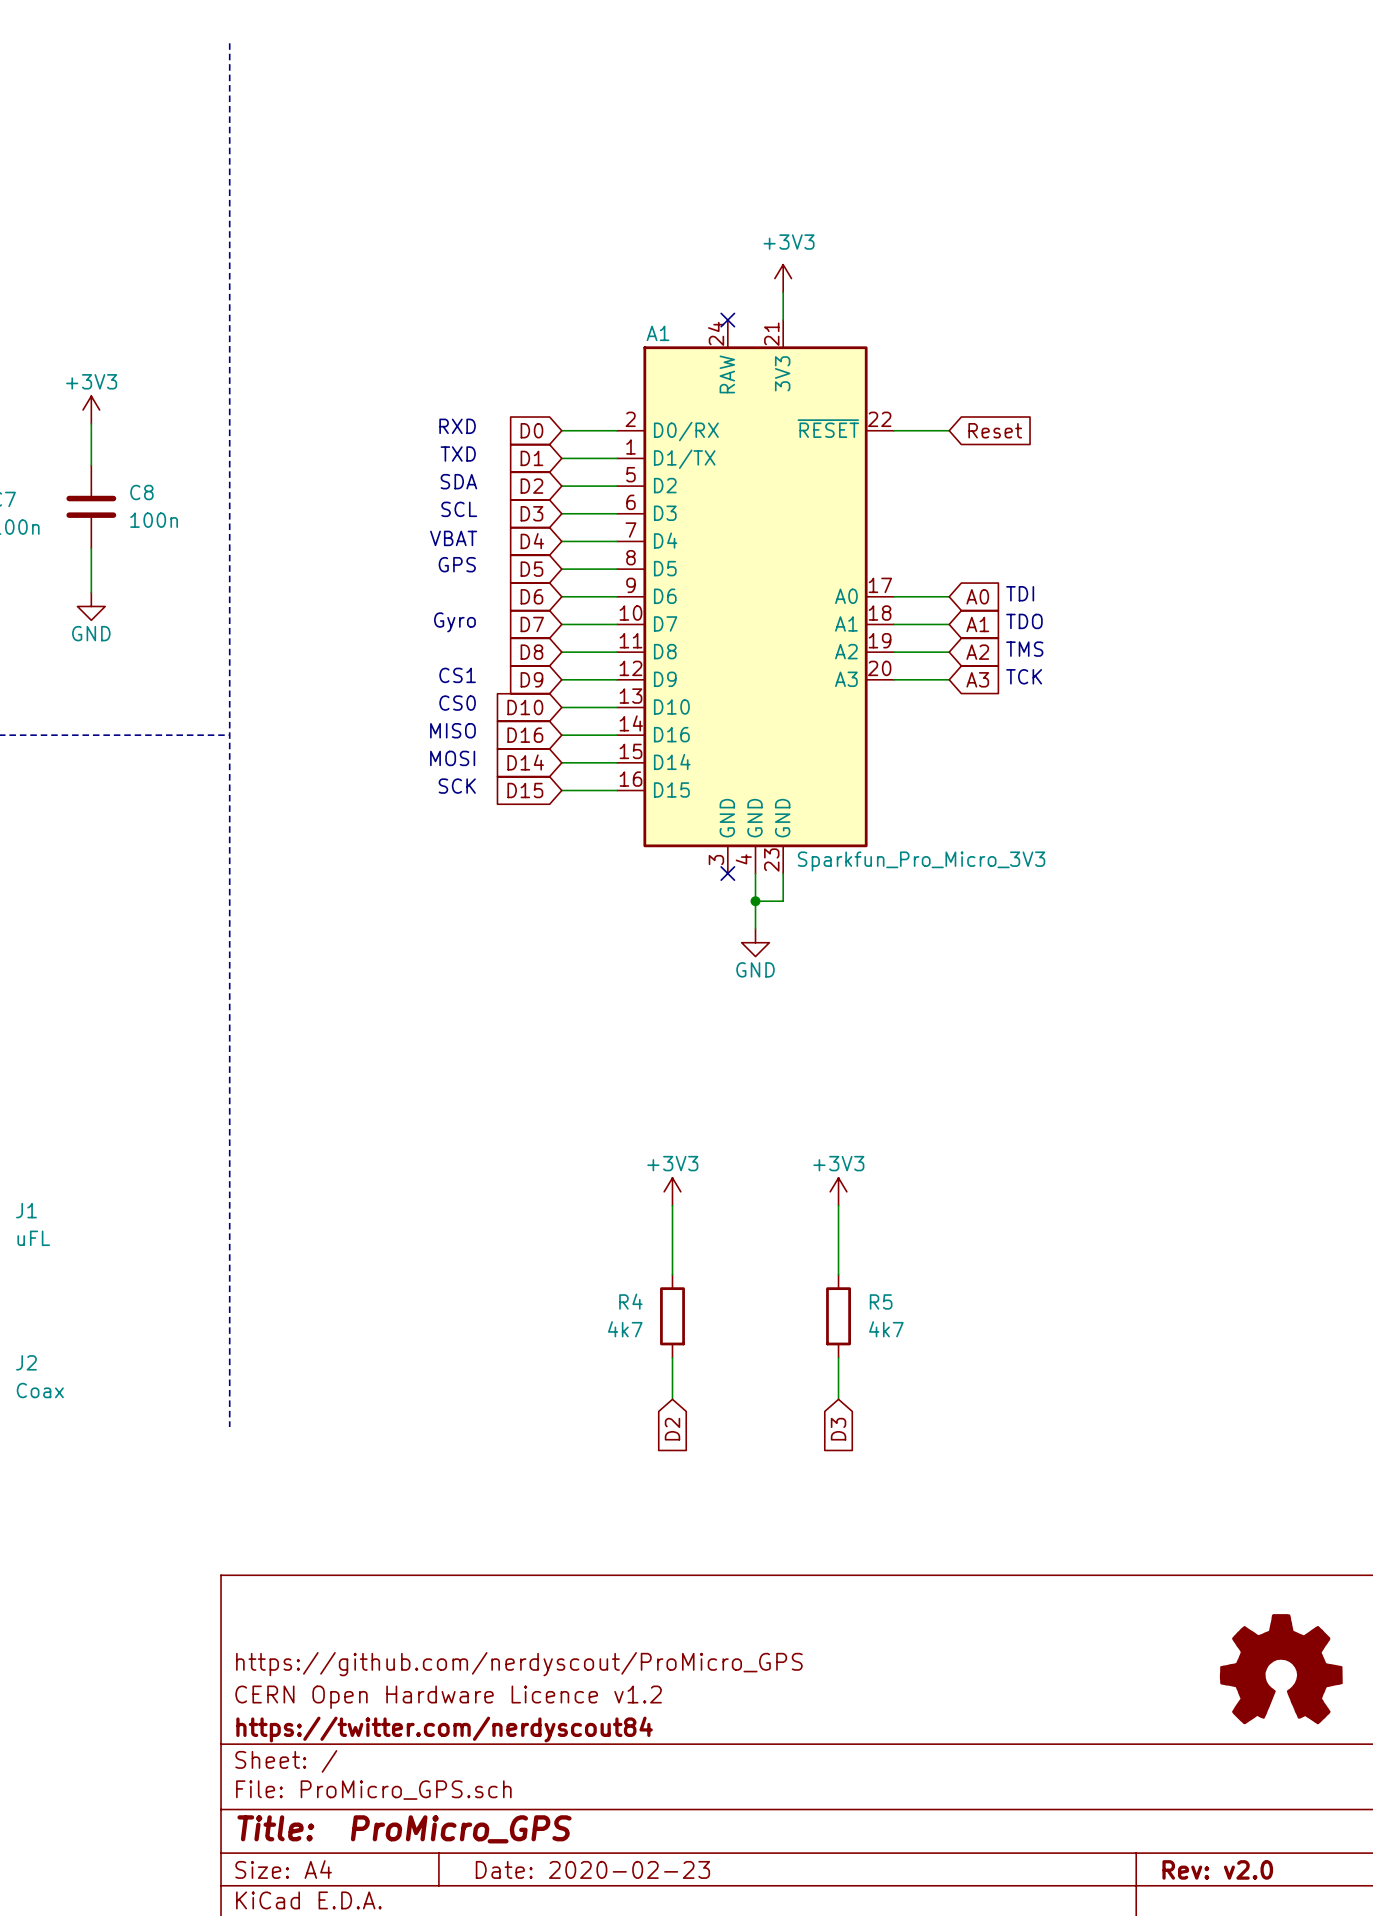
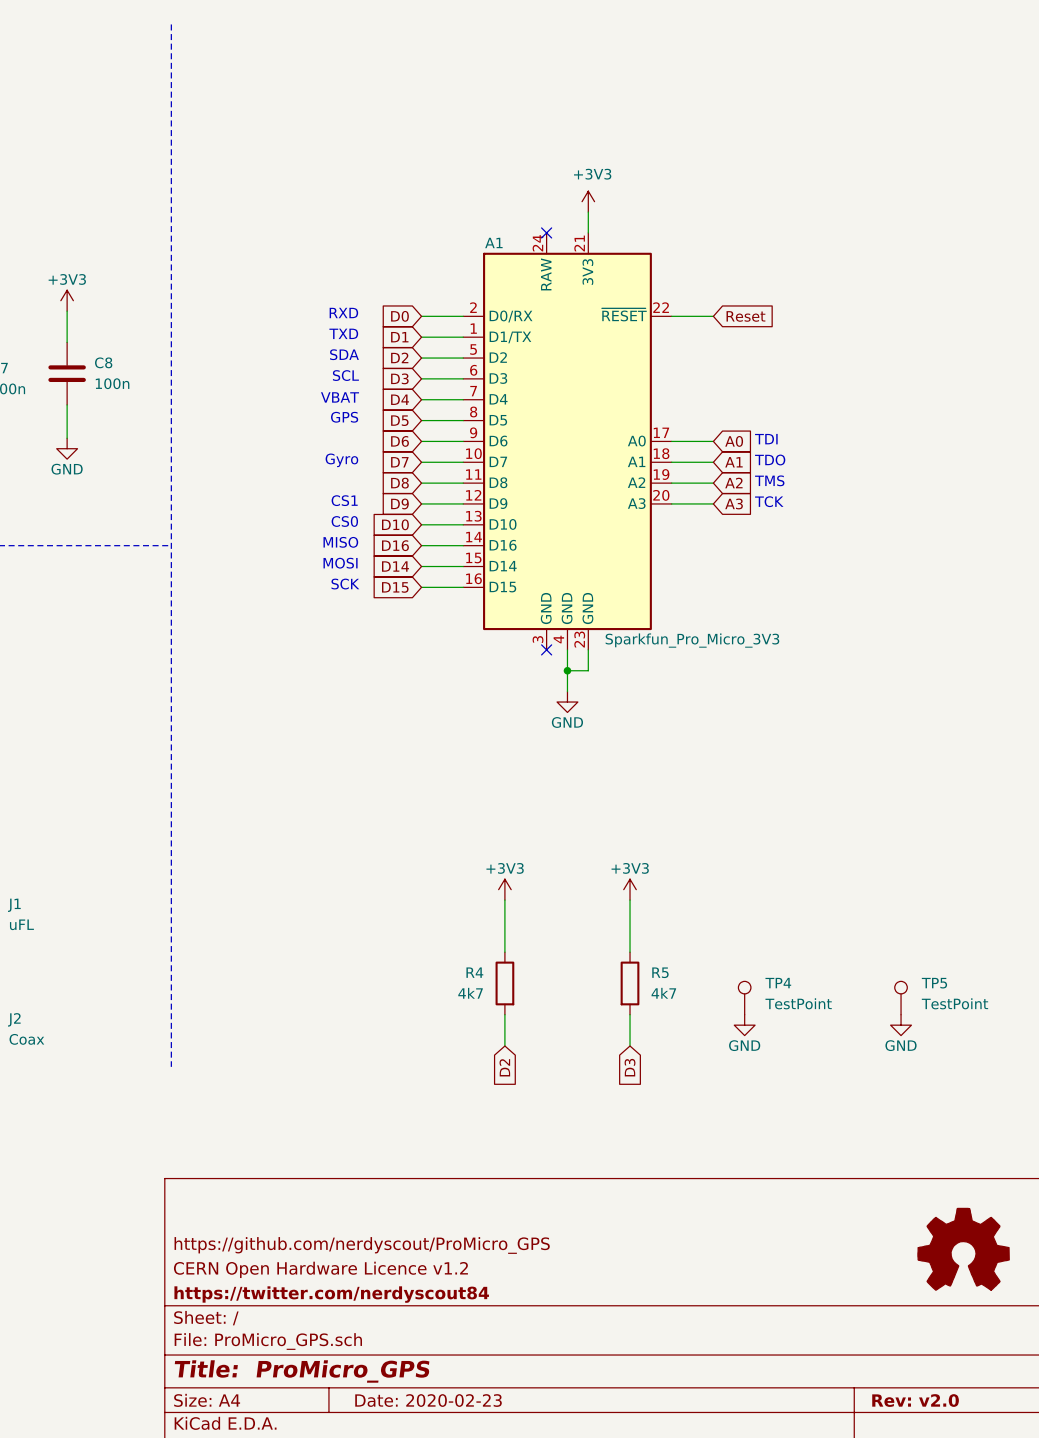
TP4: none -> TestPoint (744, 998)
TP5: none -> TestPoint (901, 998)
power symbol: none -> GND (744, 1025)
power symbol: none -> GND (901, 1025)

